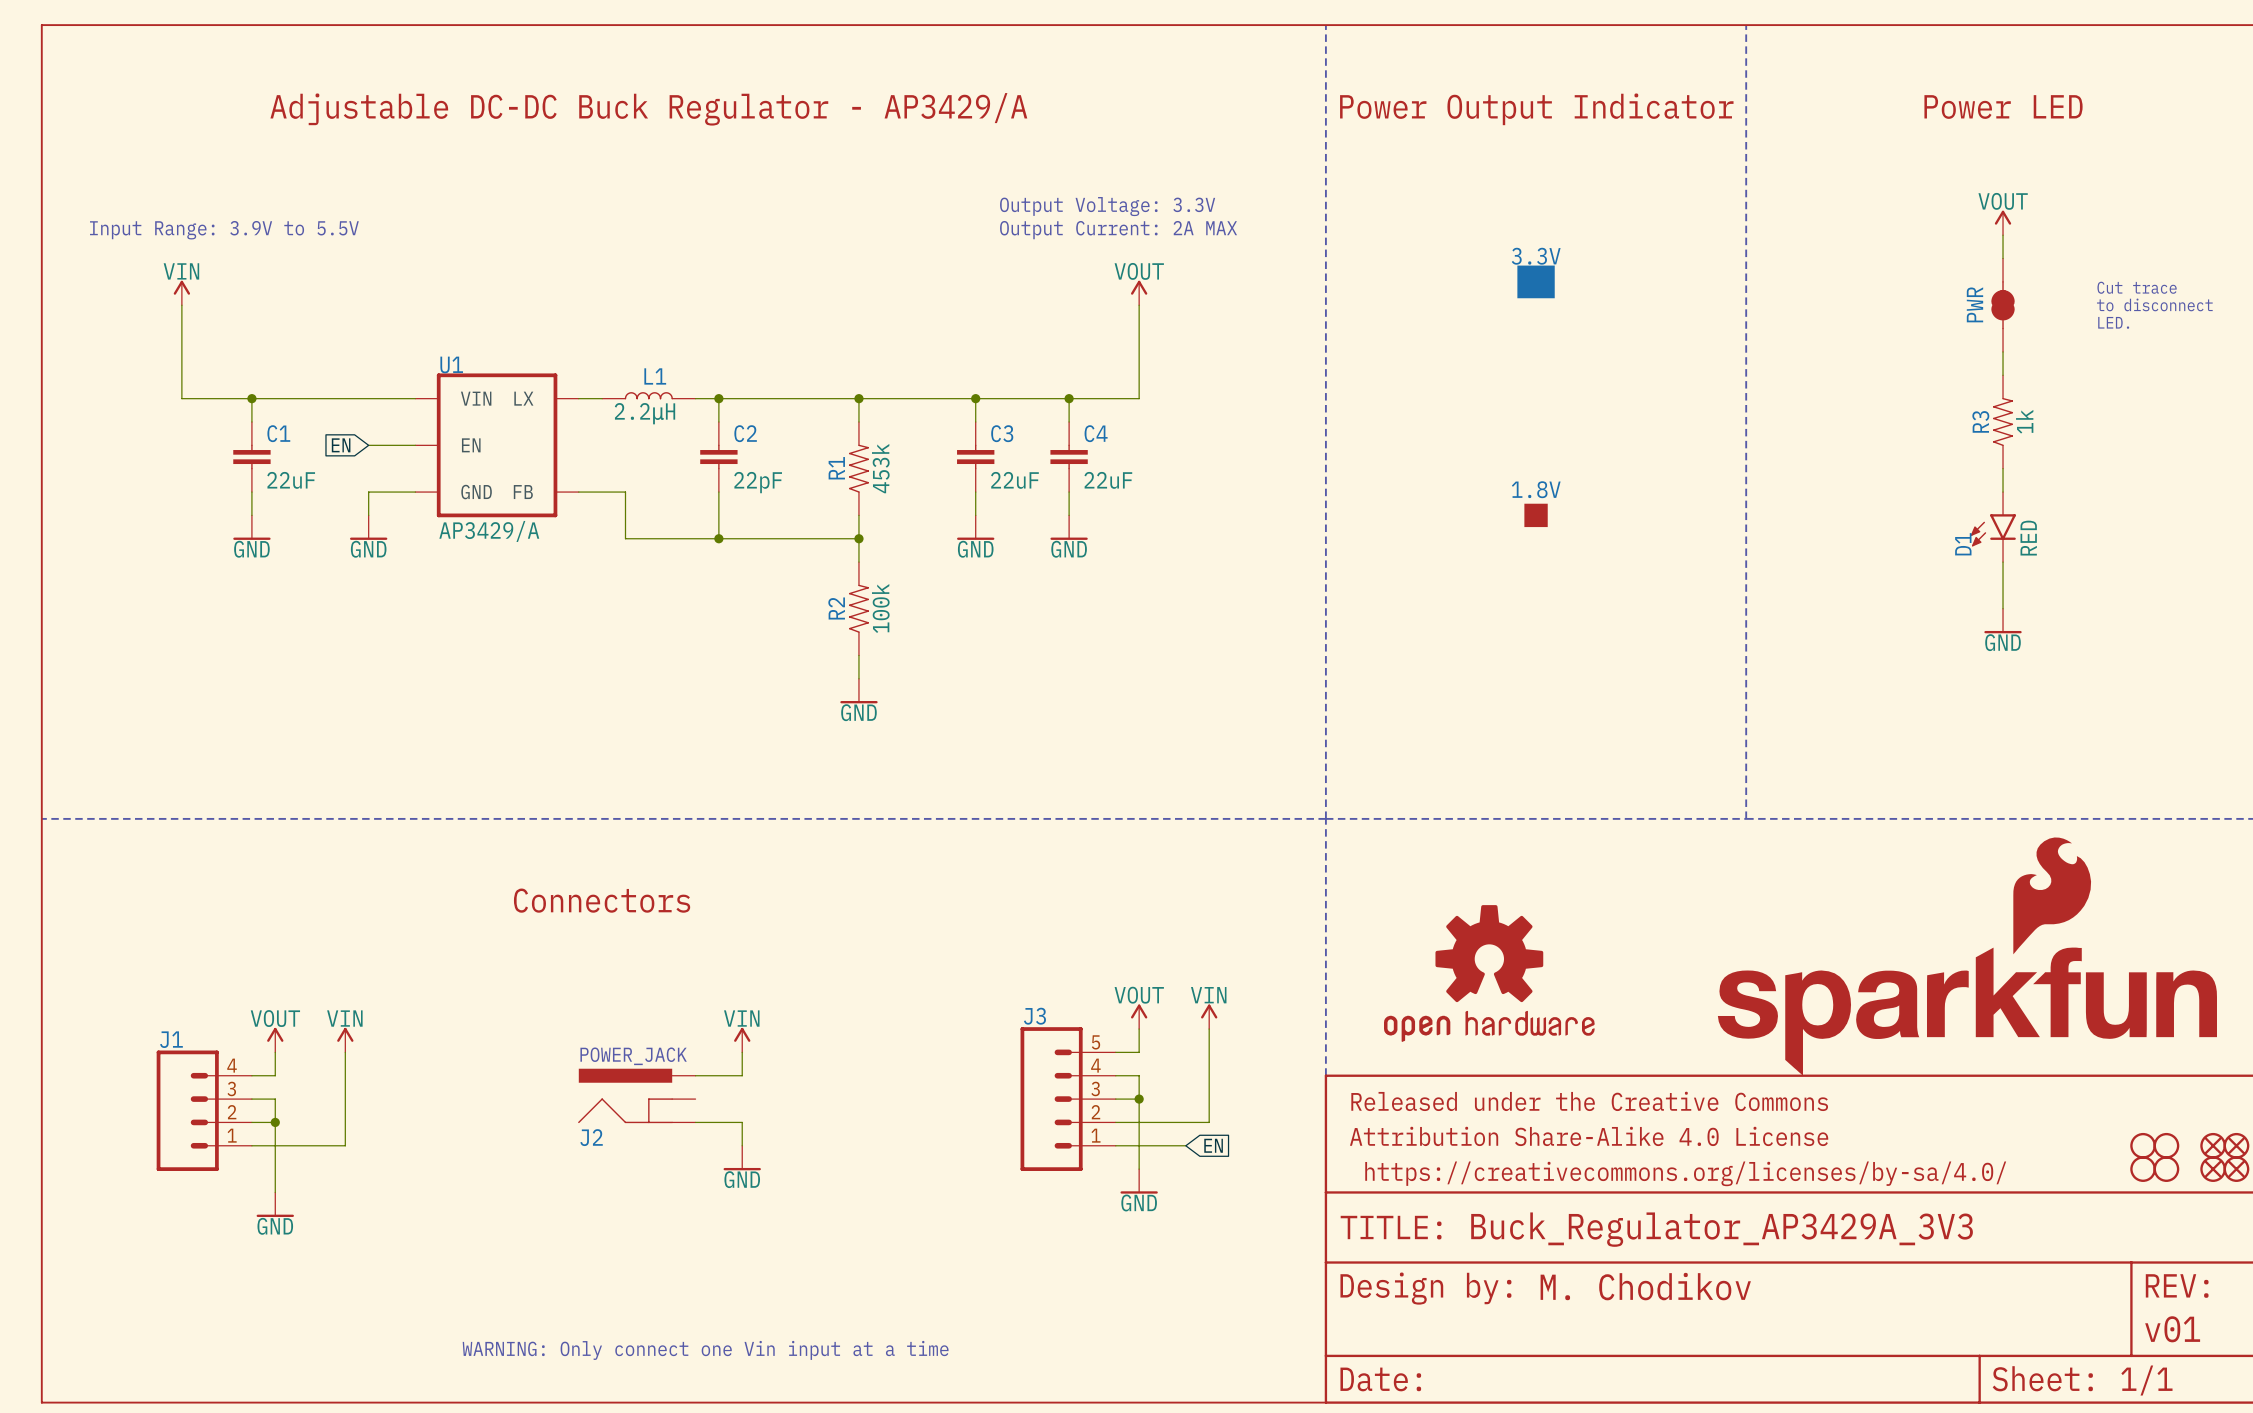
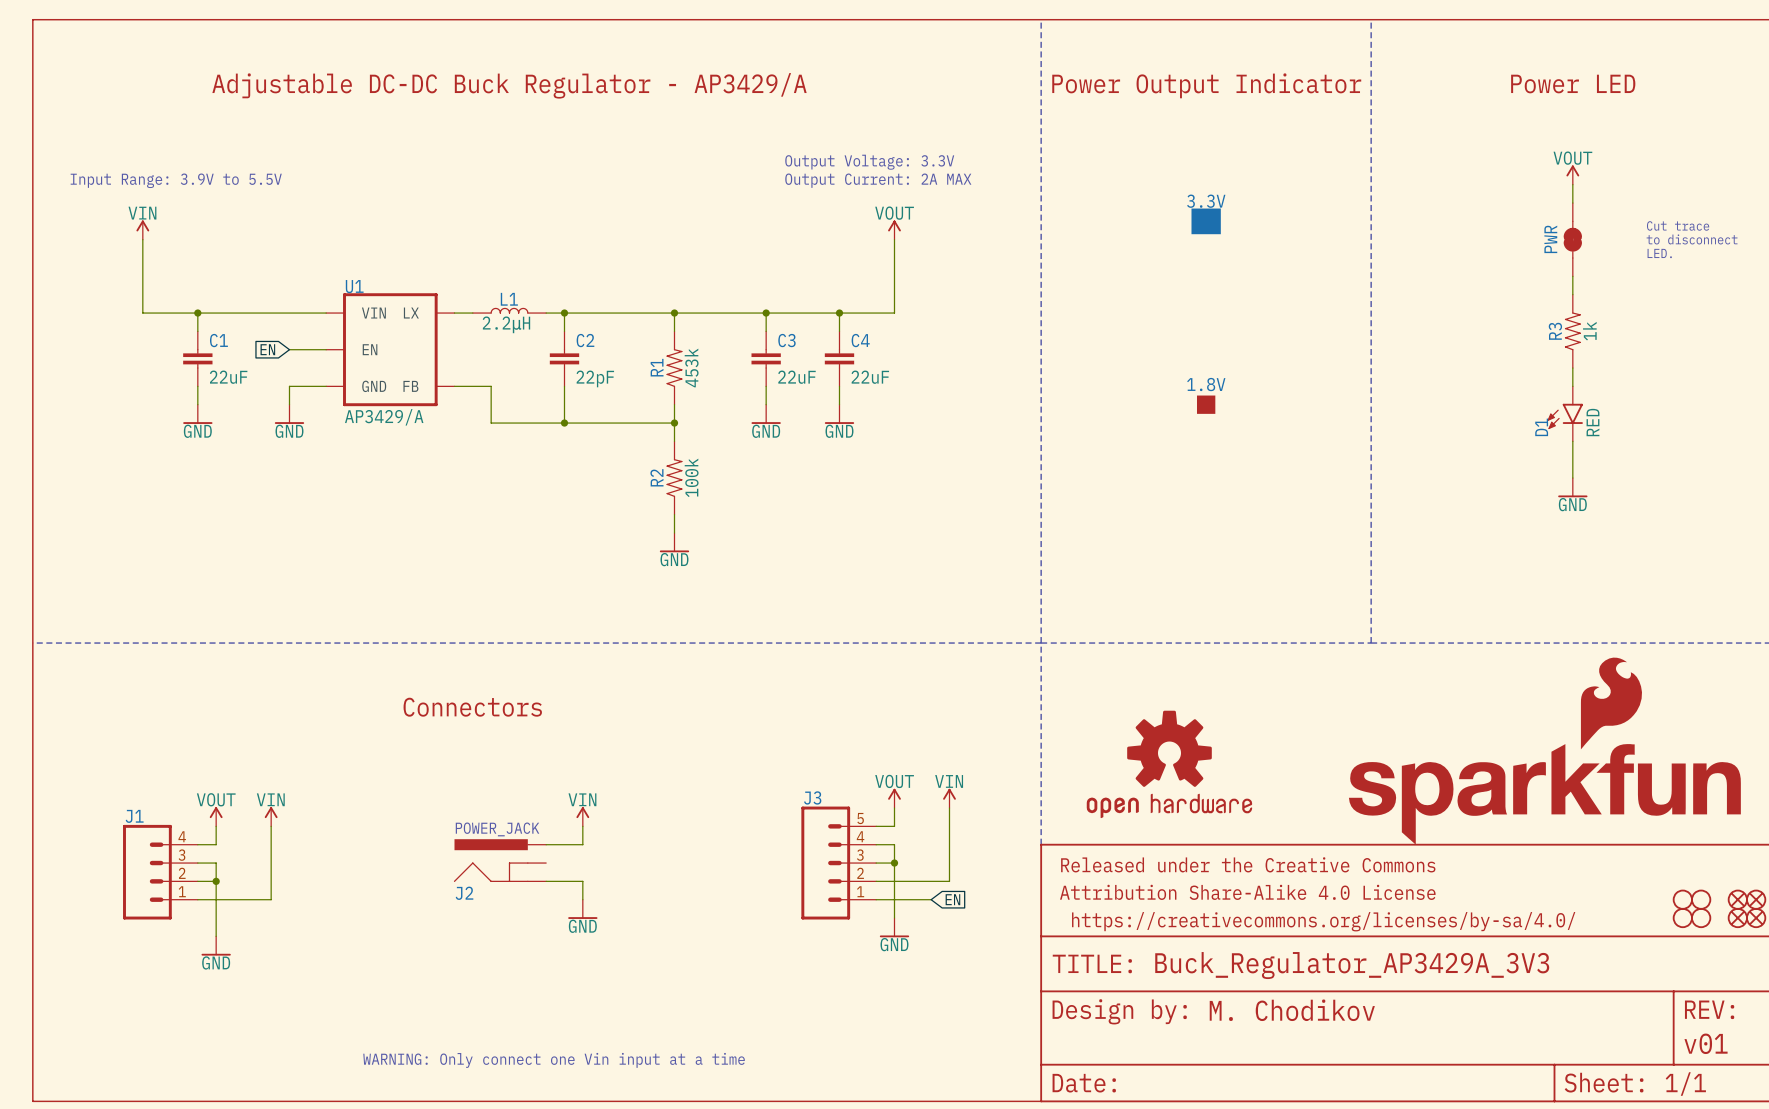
L1 name position: L1 (655, 376) -> L1 (509, 299)

